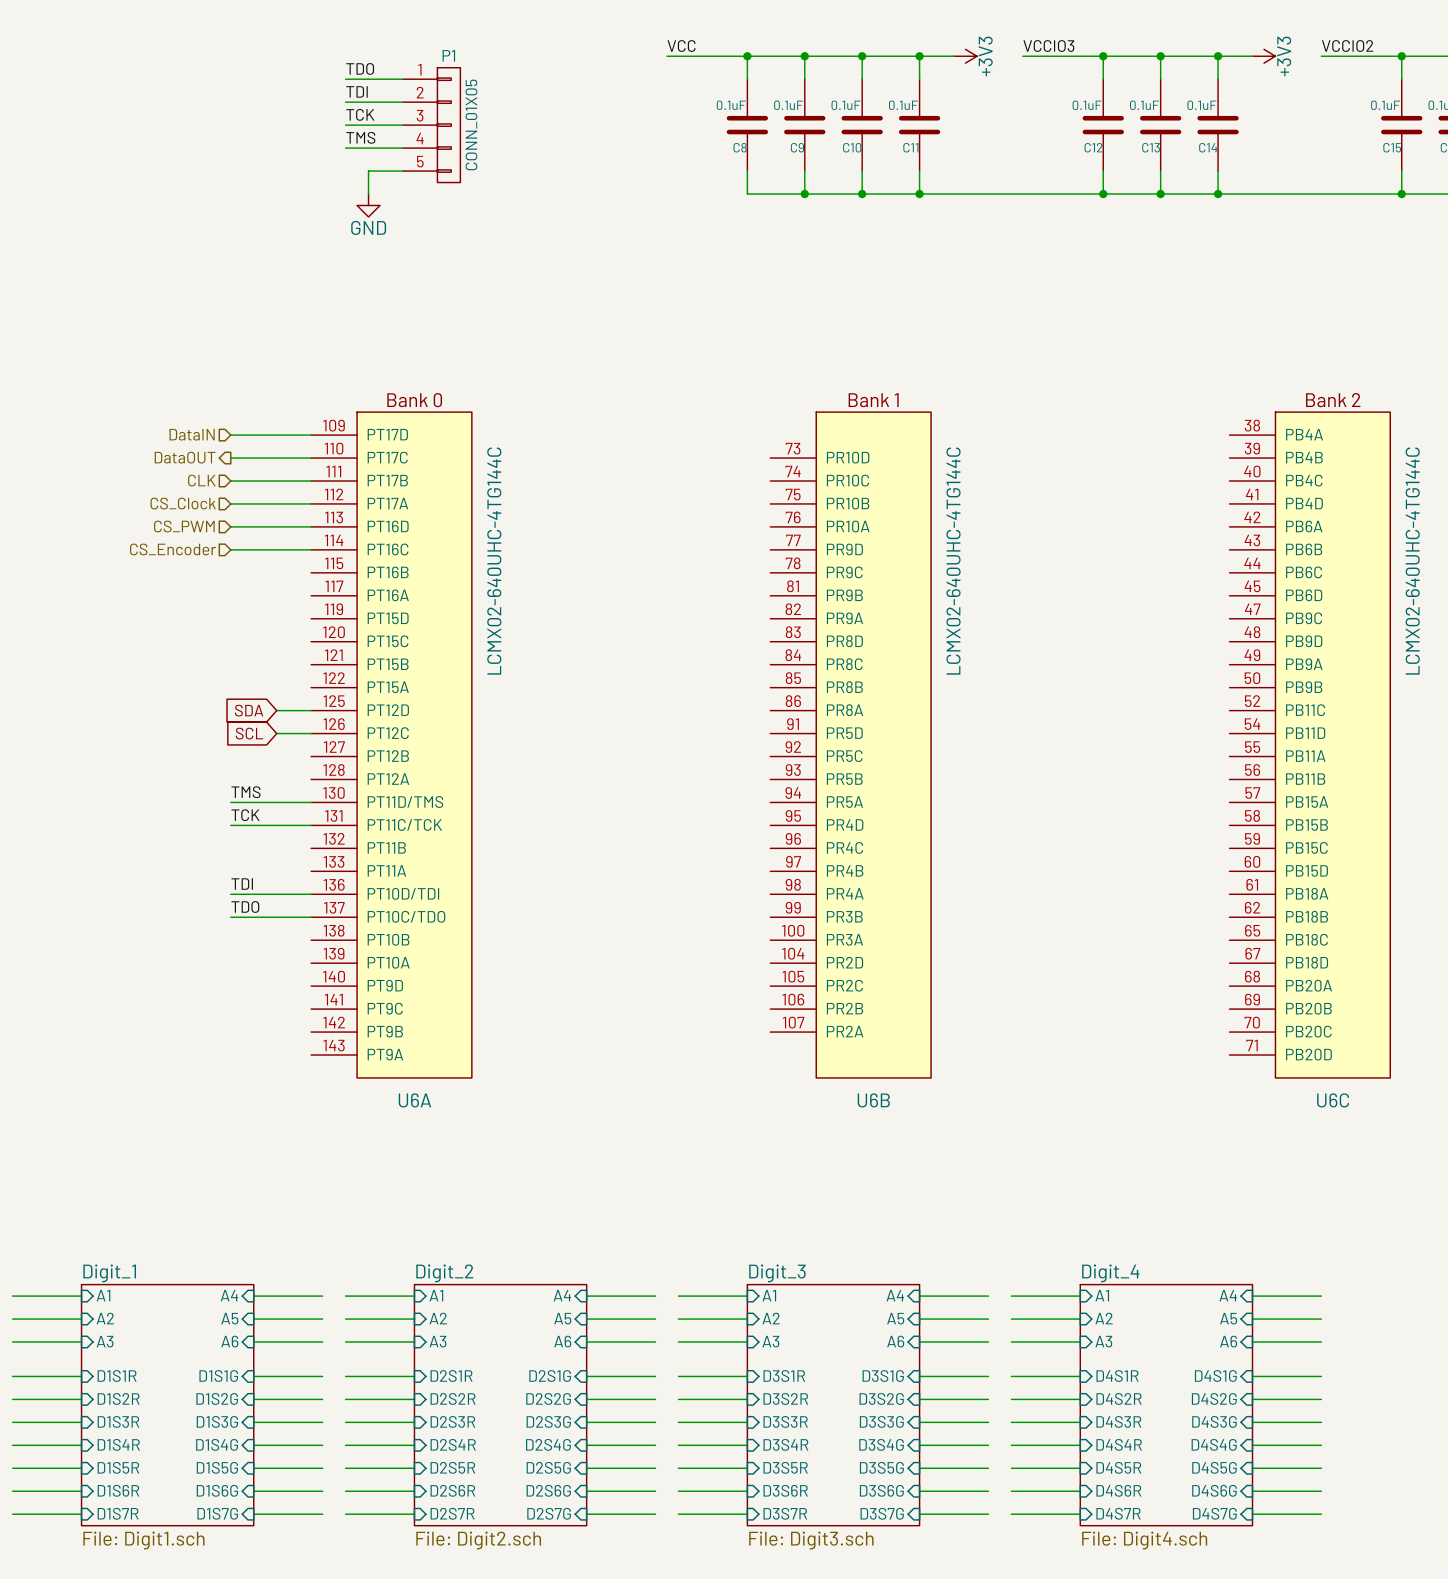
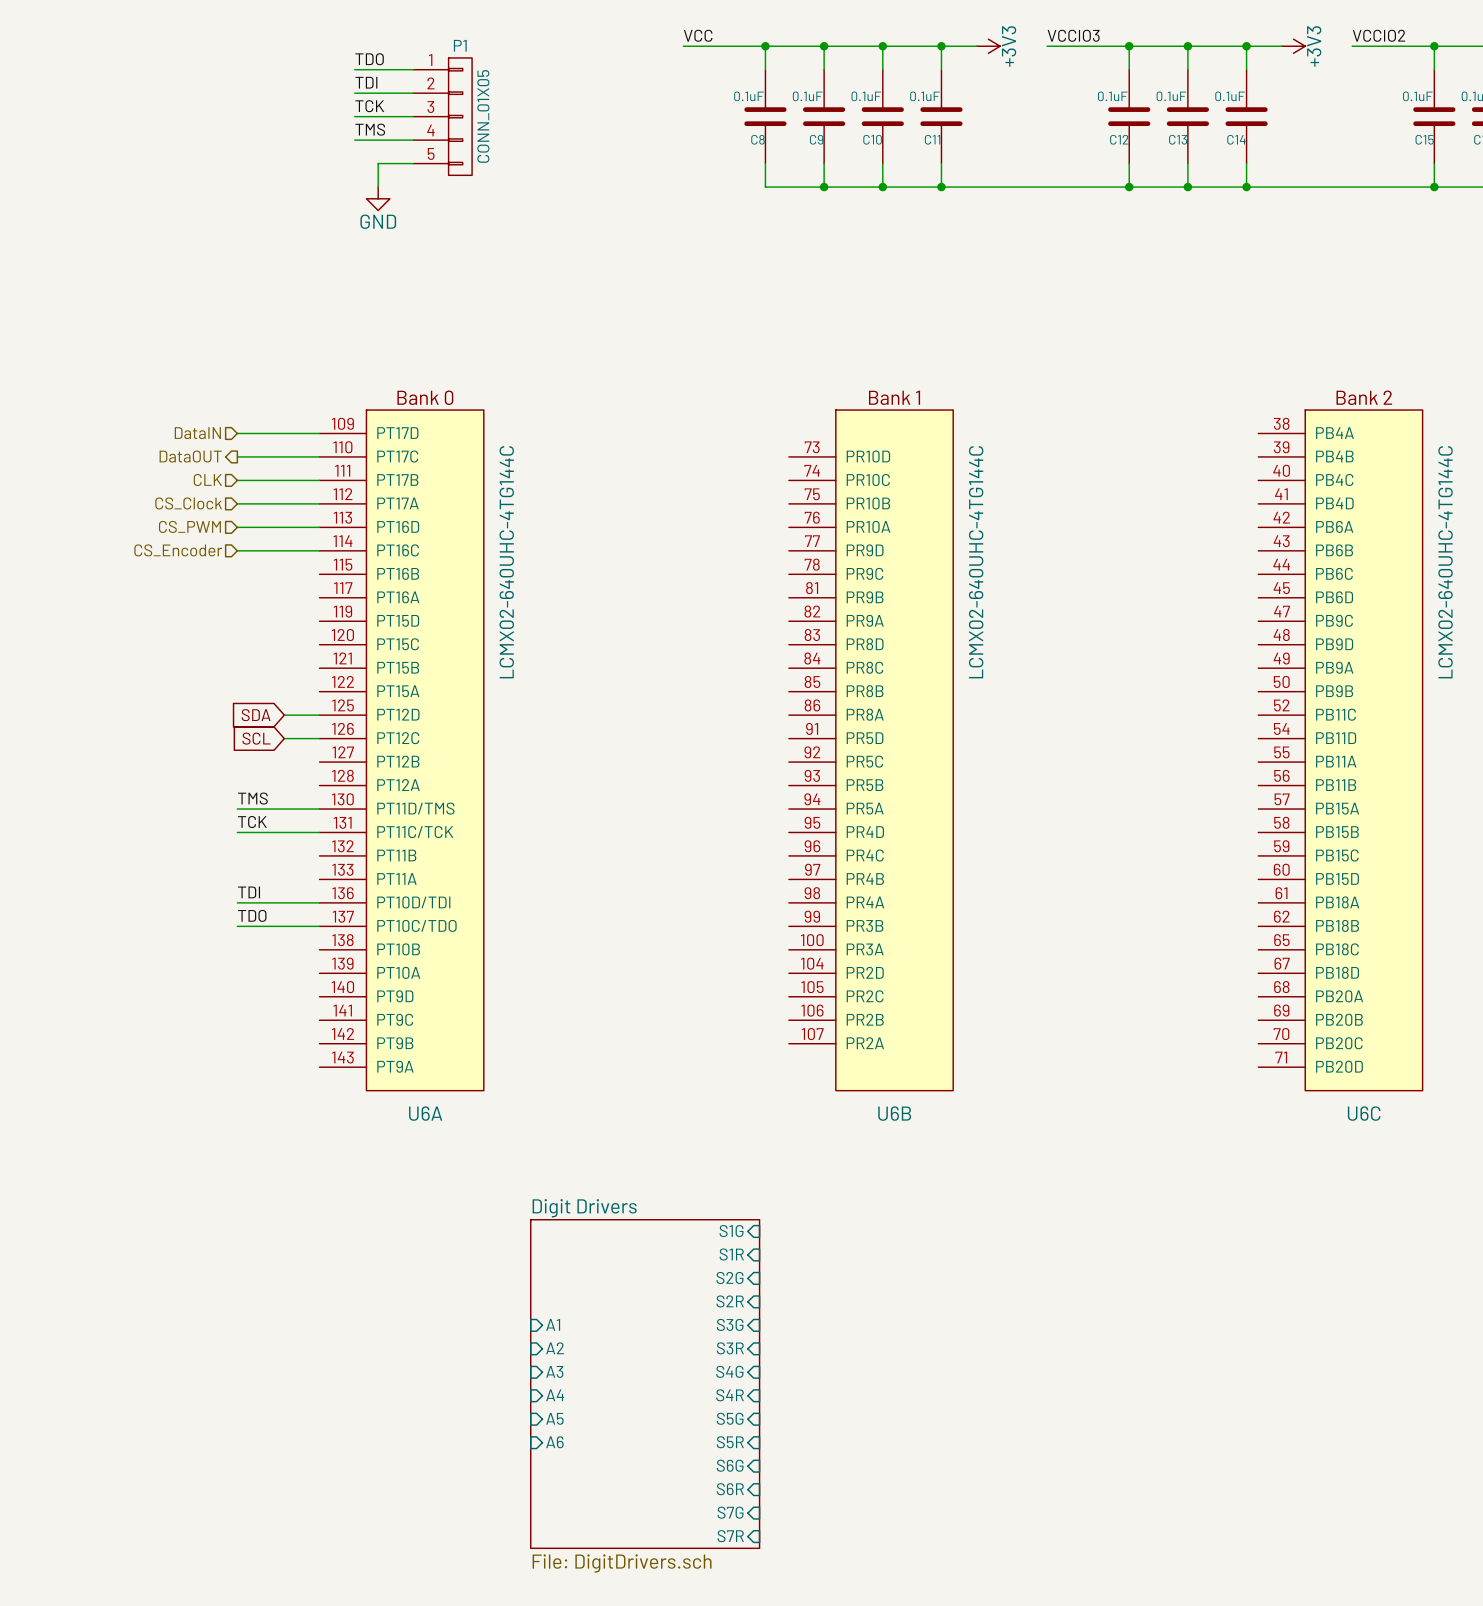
sheet pin: none -> S1G (731, 1231)
sheet pin: none -> S1R (731, 1254)
sheet pin: none -> S2G (729, 1277)
sheet pin: none -> S2R (730, 1301)
sheet pin: A1 (103, 1295) -> none
sheet pin: A4 (229, 1295) -> none
sheet pin position: A1 (436, 1295) -> A1 (553, 1324)
sheet pin rotation: 0° (562, 1295) -> 180° (555, 1395)
sheet pin position: A4 (562, 1295) -> A4 (555, 1395)
sheet pin: A1 (769, 1295) -> none
sheet pin: A4 (895, 1295) -> none
sheet pin: A1 (1102, 1295) -> none
sheet pin: A4 (1228, 1295) -> none
wire: (12, 1296) (81, 1296) -> none
wire: (253, 1296) (322, 1296) -> none
wire: (345, 1296) (414, 1296) -> none
wire: (586, 1296) (655, 1296) -> none
wire: (678, 1296) (747, 1296) -> none
wire: (919, 1296) (988, 1296) -> none
wire: (1011, 1296) (1080, 1296) -> none
wire: (1252, 1296) (1321, 1296) -> none
sheet pin: none -> S3G (730, 1324)
sheet pin: A2 (105, 1318) -> none
sheet pin: A5 (229, 1318) -> none
sheet pin position: A2 (438, 1318) -> A2 (555, 1348)
sheet pin rotation: 0° (562, 1318) -> 180° (554, 1418)
sheet pin position: A5 (562, 1318) -> A5 (554, 1418)
sheet pin: A2 (771, 1318) -> none
sheet pin: A5 (895, 1318) -> none
sheet pin: A2 (1104, 1318) -> none
sheet pin: A5 (1228, 1318) -> none
wire: (12, 1319) (81, 1319) -> none
wire: (253, 1319) (322, 1319) -> none
wire: (345, 1319) (414, 1319) -> none
wire: (586, 1319) (655, 1319) -> none
wire: (678, 1319) (747, 1319) -> none
wire: (919, 1319) (988, 1319) -> none
wire: (1011, 1319) (1080, 1319) -> none
wire: (1252, 1319) (1321, 1319) -> none
sheet pin: none -> S3R (730, 1348)
sheet pin: A3 (105, 1341) -> none
sheet pin: A6 (229, 1341) -> none
sheet pin position: A3 (437, 1341) -> A3 (554, 1371)
sheet pin rotation: 0° (562, 1341) -> 180° (554, 1442)
sheet pin position: A6 (562, 1341) -> A6 (554, 1442)
sheet pin: A3 (770, 1341) -> none
sheet pin: A6 (895, 1341) -> none
sheet pin: A3 (1103, 1341) -> none
sheet pin: A6 (1228, 1341) -> none
wire: (12, 1342) (81, 1342) -> none
wire: (253, 1342) (322, 1342) -> none
wire: (345, 1342) (414, 1342) -> none
wire: (586, 1342) (655, 1342) -> none
wire: (678, 1342) (747, 1342) -> none
wire: (919, 1342) (988, 1342) -> none
wire: (1011, 1342) (1080, 1342) -> none
wire: (1252, 1342) (1321, 1342) -> none
sheet pin: none -> S4G (729, 1371)
sheet Digit Drivers: none -> File: DigitDrivers.sch (645, 1384)
wire: (12, 1376) (81, 1376) -> none
sheet pin: D1S1R (117, 1376) -> none
sheet pin: D1S1G (218, 1376) -> none
wire: (253, 1376) (322, 1376) -> none
wire: (345, 1376) (414, 1376) -> none
sheet pin: D2S1R (451, 1376) -> none
sheet pin: D2S1G (550, 1376) -> none
wire: (586, 1376) (655, 1376) -> none
wire: (678, 1376) (747, 1376) -> none
sheet pin: none -> S4R (730, 1395)
sheet pin: D3S1R (784, 1376) -> none
sheet pin: D3S1G (883, 1376) -> none
wire: (919, 1376) (988, 1376) -> none
wire: (1011, 1376) (1080, 1376) -> none
sheet pin: D4S1R (1117, 1376) -> none
sheet pin: D4S1G (1215, 1376) -> none
wire: (1252, 1376) (1321, 1376) -> none
sheet pin: D1S2R (118, 1398) -> none
sheet pin: D1S2G (217, 1398) -> none
sheet pin: D2S2R (453, 1398) -> none
sheet pin: D2S2G (548, 1398) -> none
sheet pin: none -> S5G (730, 1418)
sheet pin: D3S2R (785, 1398) -> none
sheet pin: D3S2G (881, 1398) -> none
sheet pin: D4S2R (1119, 1398) -> none
sheet pin: D4S2G (1214, 1398) -> none
wire: (12, 1399) (81, 1399) -> none
wire: (253, 1399) (322, 1399) -> none
wire: (345, 1399) (414, 1399) -> none
wire: (586, 1399) (655, 1399) -> none
wire: (678, 1399) (747, 1399) -> none
wire: (919, 1399) (988, 1399) -> none
wire: (1011, 1399) (1080, 1399) -> none
wire: (1252, 1399) (1321, 1399) -> none
sheet Digit_1: File: Digit1.sch (167, 1405) -> none
sheet Digit_2: File: Digit2.sch (500, 1405) -> none
sheet Digit_3: File: Digit3.sch (833, 1405) -> none
sheet Digit_4: File: Digit4.sch (1166, 1405) -> none
sheet pin: D1S3R (118, 1421) -> none
sheet pin: D1S3G (217, 1421) -> none
sheet pin: D2S3R (452, 1421) -> none
sheet pin: D2S3G (548, 1421) -> none
sheet pin: none -> S5R (730, 1442)
sheet pin: D3S3R (785, 1421) -> none
sheet pin: D3S3G (881, 1421) -> none
sheet pin: D4S3R (1118, 1421) -> none
sheet pin: D4S3G (1214, 1421) -> none
wire: (12, 1422) (81, 1422) -> none
wire: (253, 1422) (322, 1422) -> none
wire: (345, 1422) (414, 1422) -> none
wire: (586, 1422) (655, 1422) -> none
wire: (678, 1422) (747, 1422) -> none
wire: (919, 1422) (988, 1422) -> none
wire: (1011, 1422) (1080, 1422) -> none
wire: (1252, 1422) (1321, 1422) -> none
sheet pin: D1S4R (118, 1444) -> none
sheet pin: D1S4G (217, 1444) -> none
sheet pin: D2S4R (453, 1444) -> none
sheet pin: D2S4G (548, 1444) -> none
sheet pin: none -> S6G (730, 1465)
sheet pin: D3S4R (785, 1444) -> none
sheet pin: D3S4G (881, 1444) -> none
sheet pin: D4S4R (1119, 1444) -> none
sheet pin: D4S4G (1214, 1444) -> none
wire: (12, 1445) (81, 1445) -> none
wire: (253, 1445) (322, 1445) -> none
wire: (345, 1445) (414, 1445) -> none
wire: (586, 1445) (655, 1445) -> none
wire: (678, 1445) (747, 1445) -> none
wire: (919, 1445) (988, 1445) -> none
wire: (1011, 1445) (1080, 1445) -> none
wire: (1252, 1445) (1321, 1445) -> none
sheet pin: D1S5R (118, 1467) -> none
sheet pin: D1S5G (217, 1467) -> none
sheet pin: D2S5R (452, 1467) -> none
sheet pin: D2S5G (548, 1467) -> none
sheet pin: none -> S6R (730, 1489)
sheet pin: D3S5R (785, 1467) -> none
sheet pin: D3S5G (881, 1467) -> none
sheet pin: D4S5R (1118, 1467) -> none
sheet pin: D4S5G (1214, 1467) -> none
wire: (12, 1468) (81, 1468) -> none
wire: (253, 1468) (322, 1468) -> none
wire: (345, 1468) (414, 1468) -> none
wire: (586, 1468) (655, 1468) -> none
wire: (678, 1468) (747, 1468) -> none
wire: (919, 1468) (988, 1468) -> none
wire: (1011, 1468) (1080, 1468) -> none
wire: (1252, 1468) (1321, 1468) -> none
sheet pin: D1S6R (118, 1490) -> none
sheet pin: D1S6G (217, 1490) -> none
sheet pin: D2S6R (452, 1490) -> none
sheet pin: D2S6G (548, 1490) -> none
sheet pin: none -> S7G (730, 1512)
sheet pin: D3S6R (785, 1490) -> none
sheet pin: D3S6G (881, 1490) -> none
sheet pin: D4S6R (1118, 1490) -> none
sheet pin: D4S6G (1214, 1490) -> none
wire: (12, 1491) (81, 1491) -> none
wire: (253, 1491) (322, 1491) -> none
wire: (345, 1491) (414, 1491) -> none
wire: (586, 1491) (655, 1491) -> none
wire: (678, 1491) (747, 1491) -> none
wire: (919, 1491) (988, 1491) -> none
wire: (1011, 1491) (1080, 1491) -> none
wire: (1252, 1491) (1321, 1491) -> none
sheet pin: D1S7R (118, 1513) -> none
sheet pin: D1S7G (217, 1513) -> none
sheet pin: D2S7R (452, 1513) -> none
sheet pin: D2S7G (549, 1513) -> none
sheet pin: none -> S7R (730, 1536)
sheet pin: D3S7R (785, 1513) -> none
sheet pin: D3S7G (882, 1513) -> none
sheet pin: D4S7R (1118, 1513) -> none
sheet pin: D4S7G (1214, 1513) -> none
wire: (12, 1514) (81, 1514) -> none
wire: (253, 1514) (322, 1514) -> none
wire: (345, 1514) (414, 1514) -> none
wire: (586, 1514) (655, 1514) -> none
wire: (678, 1514) (747, 1514) -> none
wire: (919, 1514) (988, 1514) -> none
wire: (1011, 1514) (1080, 1514) -> none
wire: (1252, 1514) (1321, 1514) -> none

